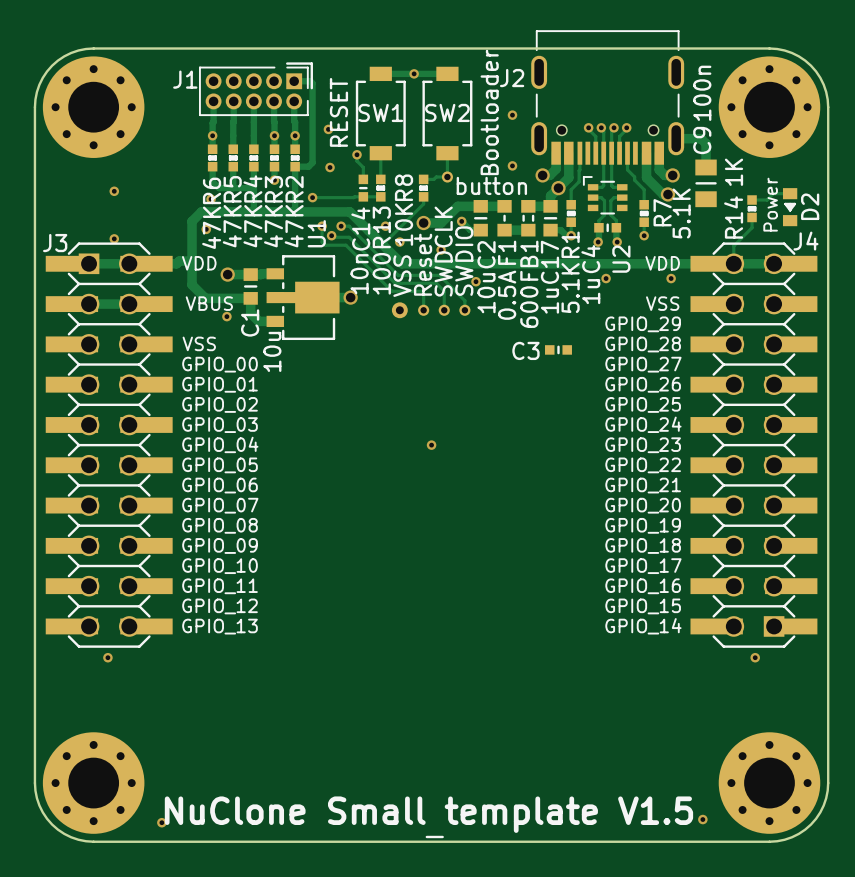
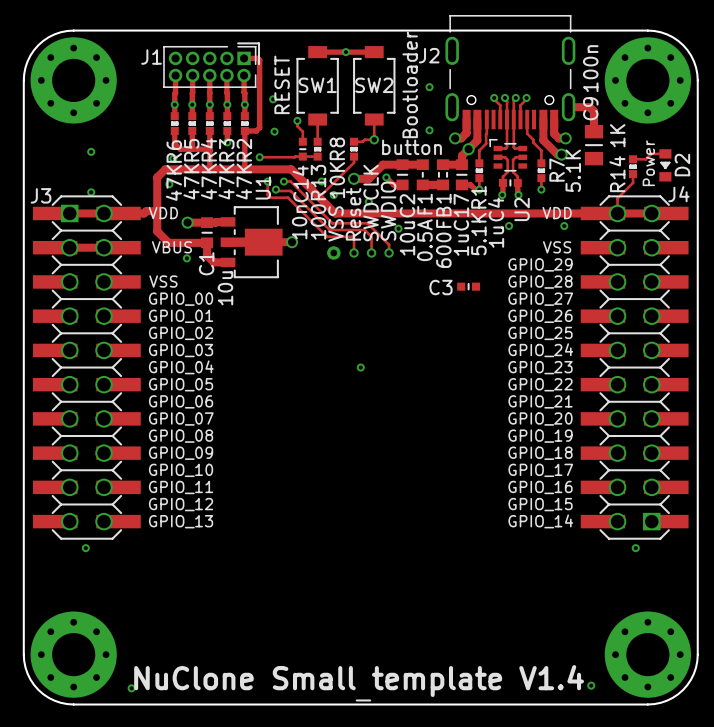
via: none -> (192, 104)
via: none -> (209, 104)
drawing shape: [164, 796, 694, 839] -> [134, 665, 584, 702]

